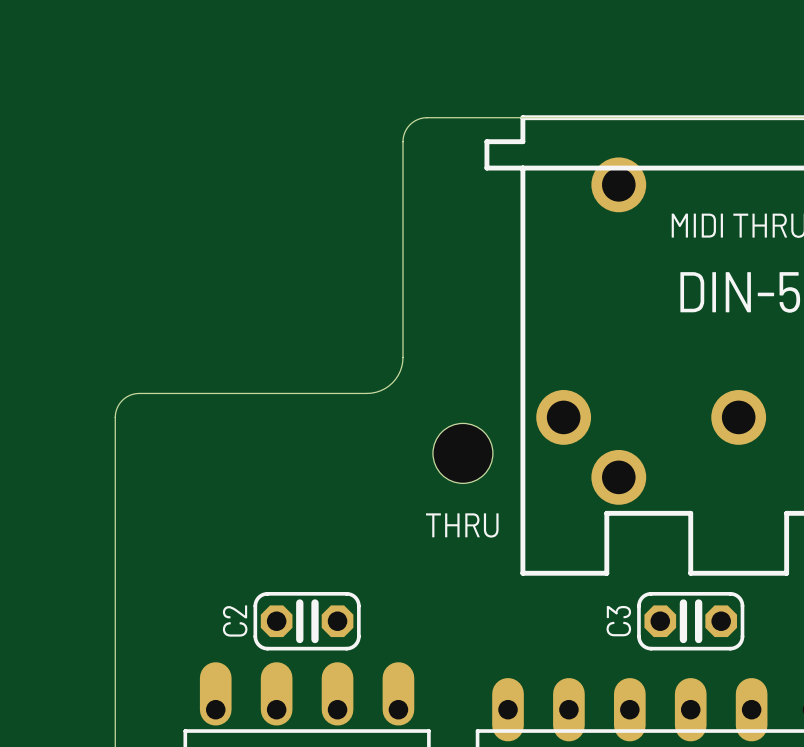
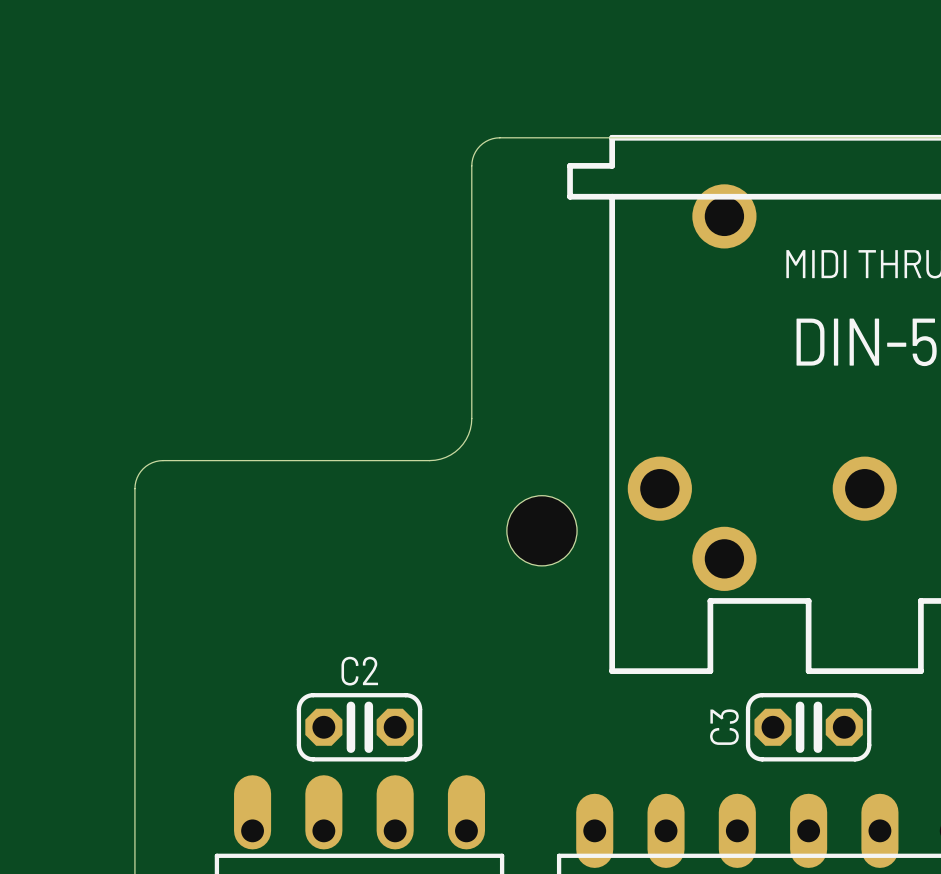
text: THRU (462, 525) -> none
C2 name rotation: 0° (235, 621) -> 90° clockwise (359, 671)
C2 name position: C2 (235, 621) -> C2 (359, 671)

